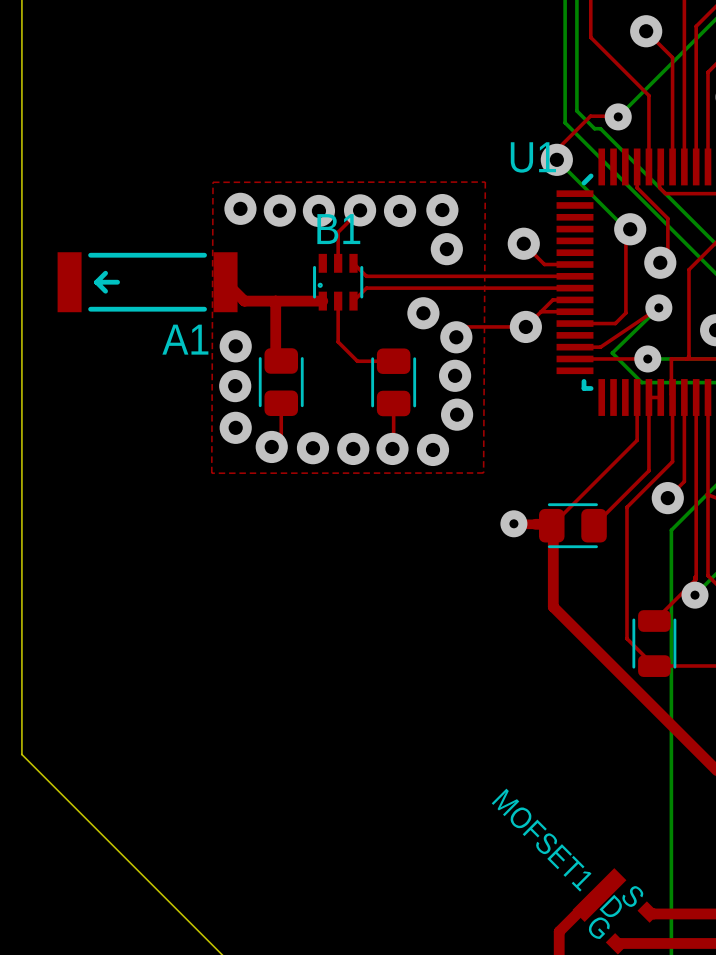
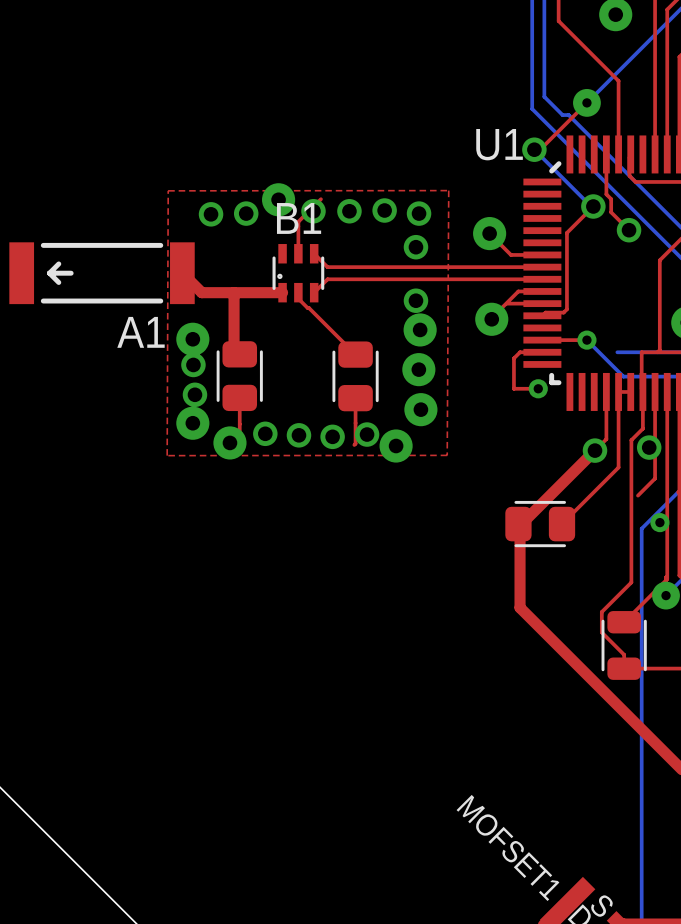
top track: (646, 31) (672, 57) (672, 166) -> none
top track: (618, 116) (590, 116) (556, 149) (556, 159) -> (586, 102) (540, 149) (534, 149)
via size: [540, 143, 573, 176] -> [522, 137, 547, 162]
bottom track: (556, 159) (626, 229) (630, 229) -> none
bottom track: none -> (534, 149) (591, 206) (593, 206)
top zone outline: (485, 182) (213, 182) (211, 473) (483, 472) (485, 182) -> (448, 190) (168, 190) (167, 455) (447, 455) (448, 190)
top track: (637, 187) (667, 218) (667, 255) (660, 262) -> (606, 175) (606, 194) (611, 199) (611, 212) (629, 230)
via size: [343, 194, 377, 227] -> [301, 199, 326, 224]
via: (240, 208) -> none
via: (279, 210) -> none
via: (400, 210) -> none
via: (442, 210) -> none
via size: [614, 213, 647, 246] -> [581, 194, 606, 219]
via: none -> (384, 210)
via: none -> (349, 211)
via: none -> (246, 213)
via: none -> (419, 213)
via: none -> (211, 214)
top track: (630, 229) (625, 233) (625, 312) (615, 323) (575, 323) -> (593, 206) (566, 232) (566, 309) (563, 312) (545, 312) (542, 315)
via size: [430, 233, 463, 266] -> [403, 234, 429, 260]
via position: (660, 262) -> (629, 230)
top track: (552, 299) (525, 326) (466, 326) (456, 337) -> (519, 291) (493, 316)
top track: (338, 306) (338, 341) (357, 361) (393, 361) -> (298, 298) (355, 354)
top track: (658, 307) (600, 347) -> (586, 340) (568, 340)
bottom track: (658, 307) (612, 353) (641, 382) (653, 382) -> (586, 340) (623, 376)
via: (658, 307) -> none
via: none -> (415, 300)
via: (423, 313) -> none
via: none -> (586, 340)
top track: (575, 358) (647, 358) -> (542, 352) (520, 352) (513, 358) (513, 388) (538, 388)
via: (647, 358) -> none
via: none -> (193, 364)
via: (235, 386) -> none
via: none -> (538, 388)
via: none -> (194, 394)
via size: [296, 432, 330, 465] -> [253, 421, 278, 447]
top track: (672, 433) (672, 461) (626, 507) (626, 638) (654, 666) -> (642, 428) (631, 440) (631, 582) (601, 612) (601, 632) (624, 654) (624, 668)
via: none -> (367, 434)
via: none -> (298, 435)
top track: (637, 440) (551, 525) (513, 523) -> (606, 436) (606, 439) (521, 524) (518, 524)
via: none -> (332, 436)
via: (353, 448) -> none
via: (392, 448) -> none
via: none -> (649, 447)
via: none -> (594, 450)
via: (667, 498) -> none
via: (513, 523) -> none
via: none -> (659, 522)

